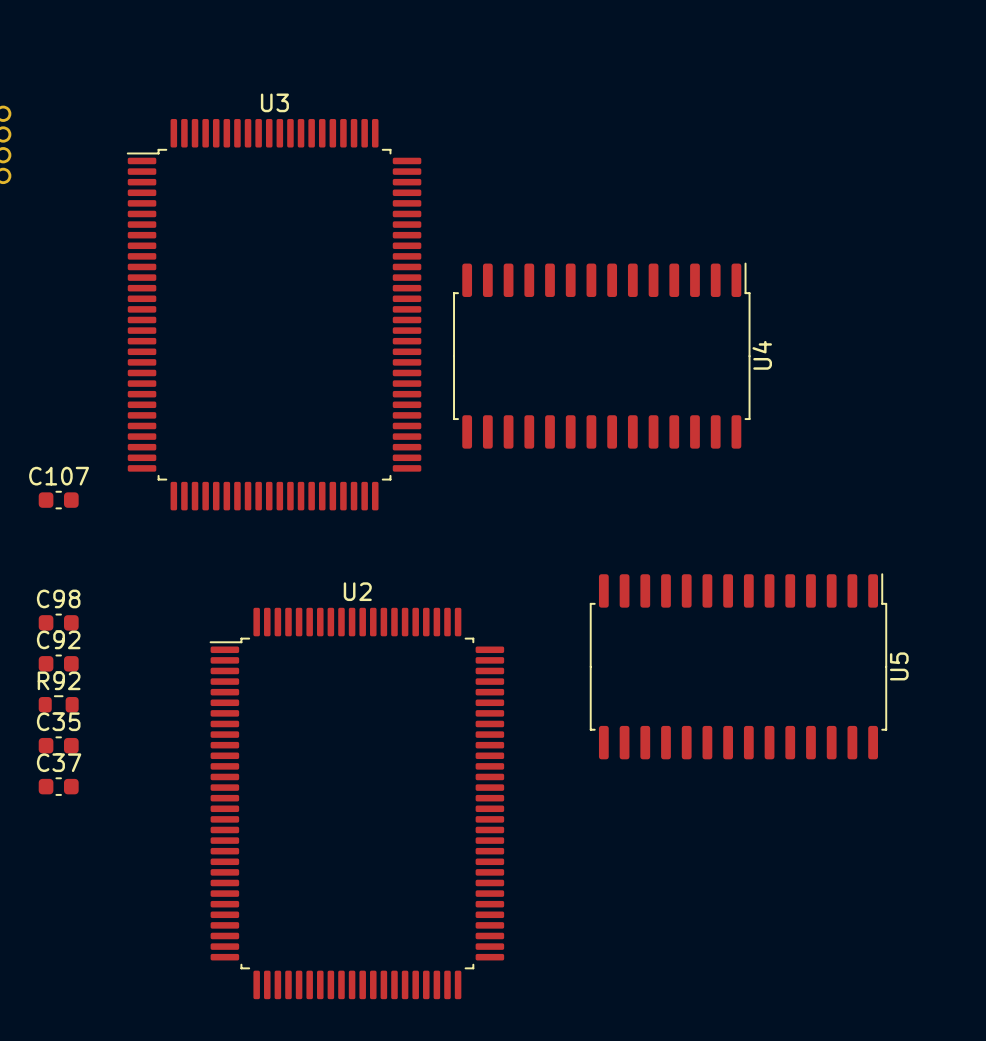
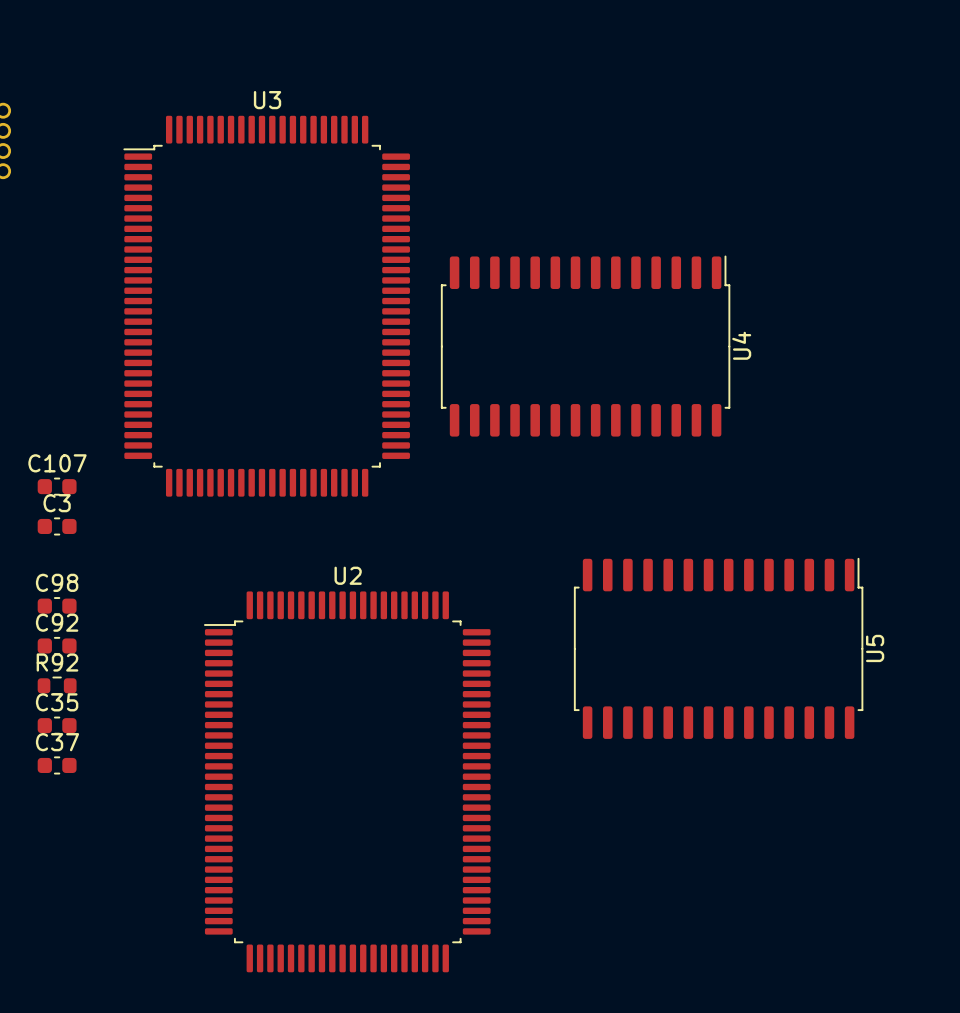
C3: none -> (57, 526)

